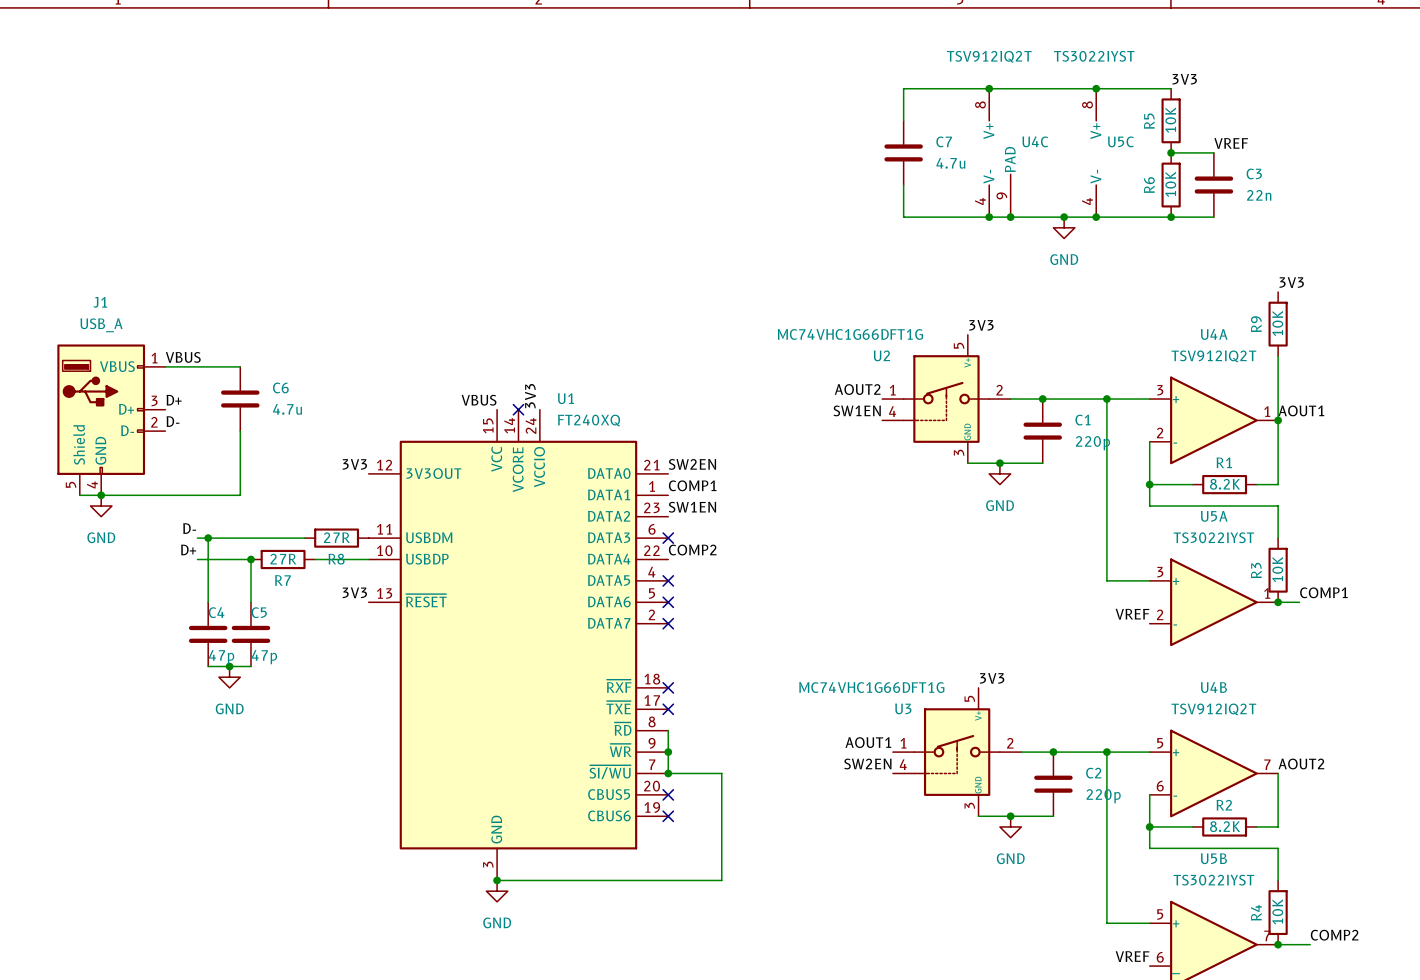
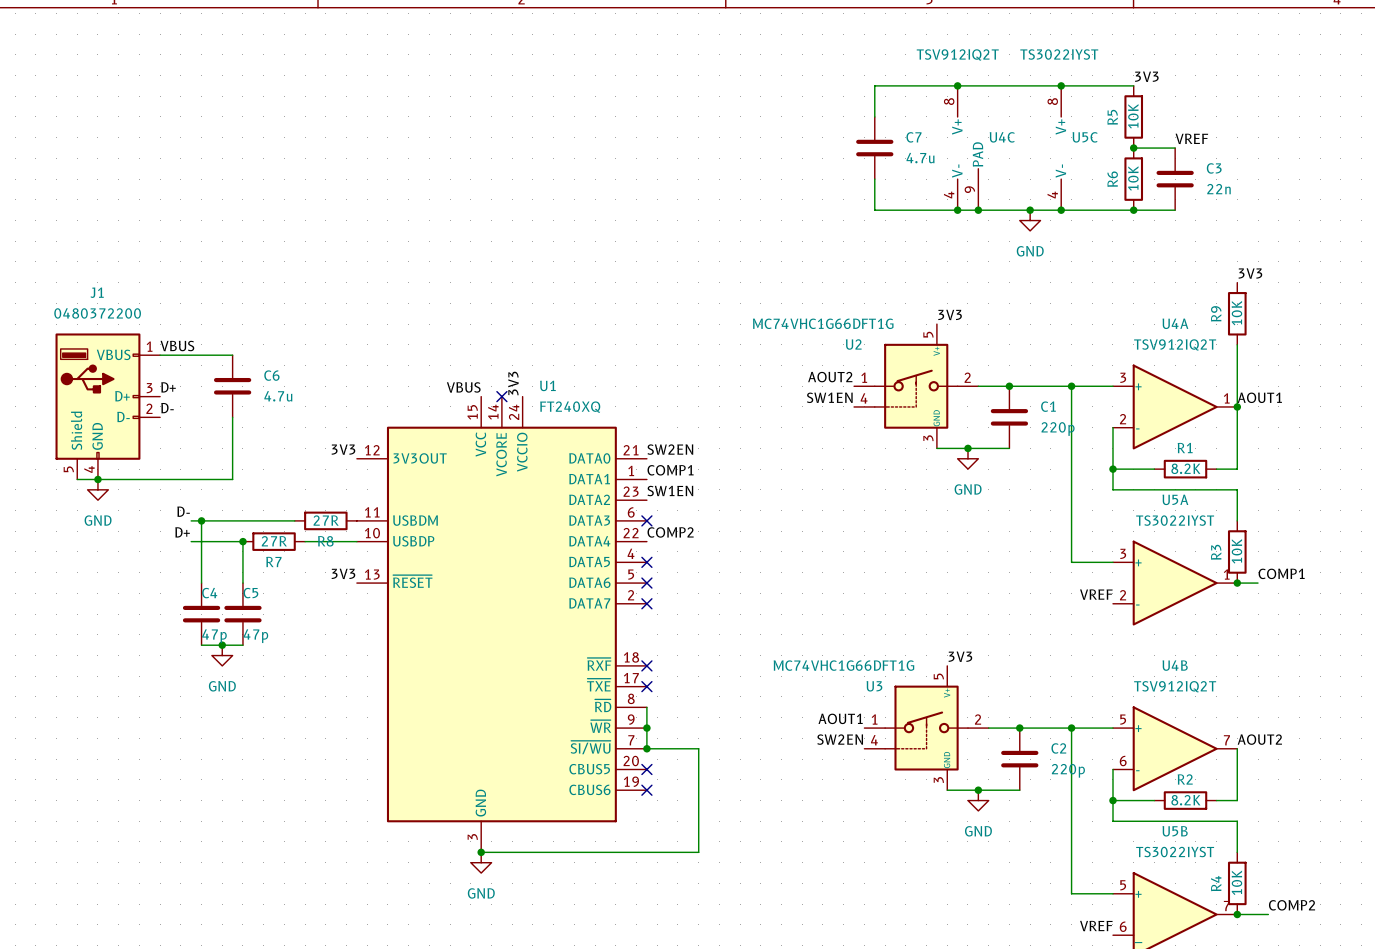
J1 value: USB_A (101, 325) -> 0480372200 (97, 313)

